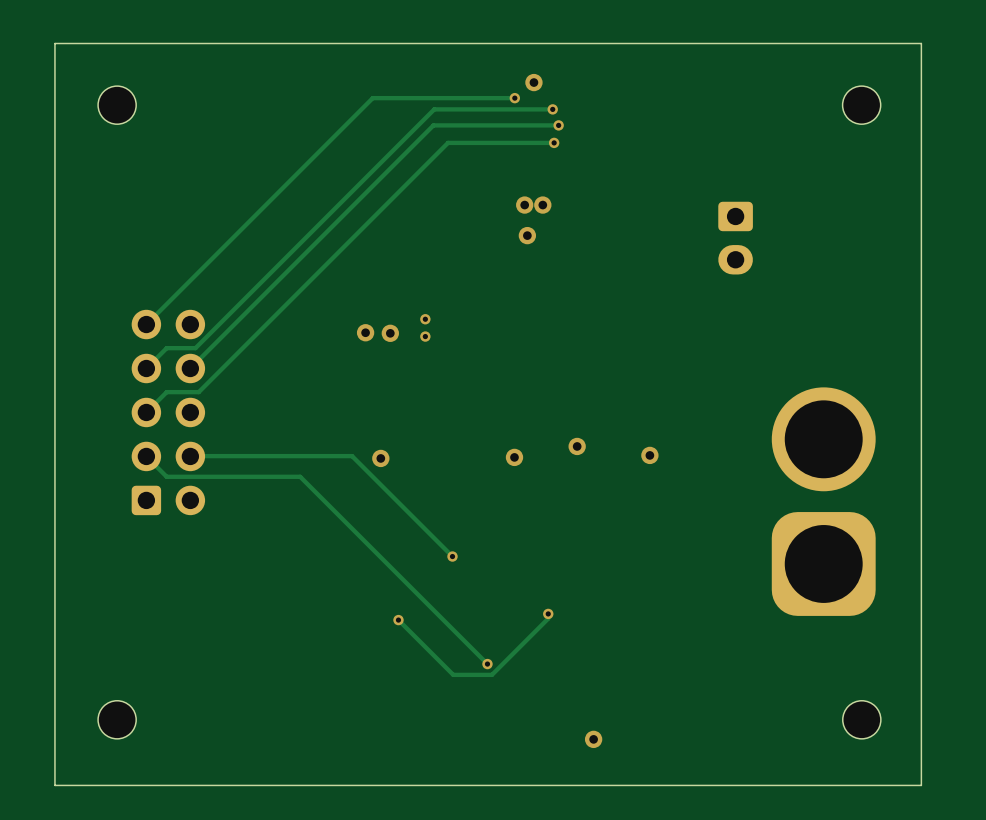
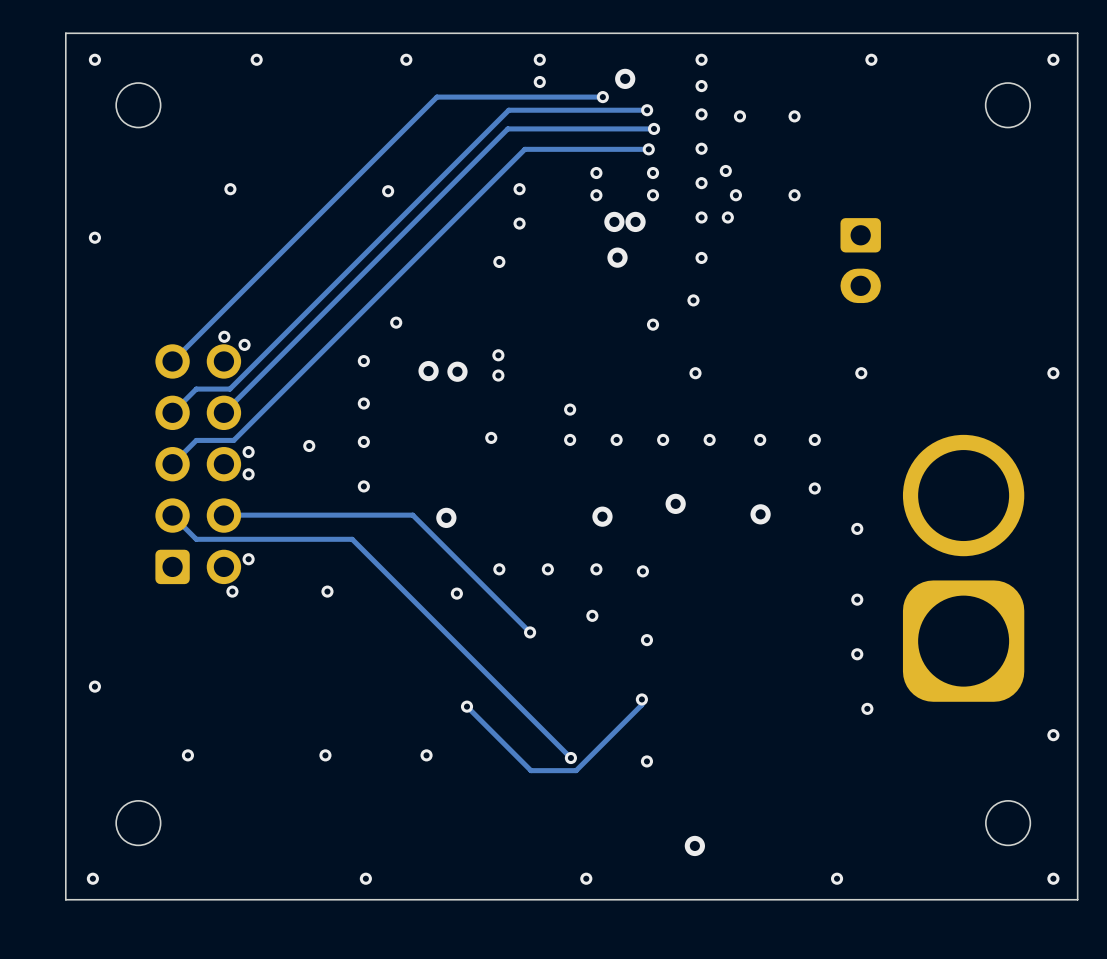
via: none -> (94, 59)
via: none -> (256, 59)
via: none -> (406, 59)
via: none -> (539, 59)
via: none -> (701, 59)
via: none -> (871, 59)
via: none -> (1053, 59)
via: none -> (539, 82)
via: none -> (701, 86)
via: none -> (701, 114)
via: none -> (739, 116)
via: none -> (794, 116)
via: none -> (701, 148)
via: none -> (725, 170)
via: none -> (596, 173)
via: none -> (653, 173)
via: none -> (701, 183)
via: none -> (230, 189)
via: none -> (519, 189)
via: none -> (388, 191)
via: none -> (596, 195)
via: none -> (653, 195)
via: none -> (735, 195)
via: none -> (794, 195)
via: none -> (701, 217)
via: none -> (727, 217)
via: none -> (519, 223)
via: none -> (94, 237)
via: none -> (701, 257)
via: none -> (499, 261)
via: none -> (693, 300)
via: none -> (396, 322)
via: none -> (653, 324)
via: none -> (224, 336)
via: none -> (244, 344)
via: none -> (363, 361)
via: none -> (695, 373)
via: none -> (861, 373)
via: none -> (1053, 373)
via: none -> (363, 403)
via: none -> (570, 409)
via: none -> (491, 437)
via: none -> (570, 439)
via: none -> (616, 439)
via: none -> (663, 439)
via: none -> (709, 439)
via: none -> (760, 439)
via: none -> (814, 439)
via: none -> (363, 441)
via: none -> (309, 445)
via: none -> (248, 452)
via: none -> (248, 474)
via: none -> (363, 486)
via: none -> (814, 488)
via: none -> (857, 528)
via: none -> (248, 559)
via: none -> (499, 569)
via: none -> (547, 569)
via: none -> (596, 569)
via: none -> (642, 571)
via: none -> (232, 591)
via: none -> (327, 591)
via: none -> (456, 593)
via: none -> (857, 599)
via: none -> (592, 615)
via: none -> (646, 640)
via: none -> (857, 654)
via: none -> (94, 686)
via: none -> (867, 708)
via: none -> (1053, 735)
via: none -> (187, 755)
via: none -> (325, 755)
via: none -> (426, 755)
via: none -> (646, 761)
via: none -> (92, 878)
via: none -> (365, 878)
via: none -> (586, 878)
via: none -> (837, 878)
via: none -> (1053, 878)

